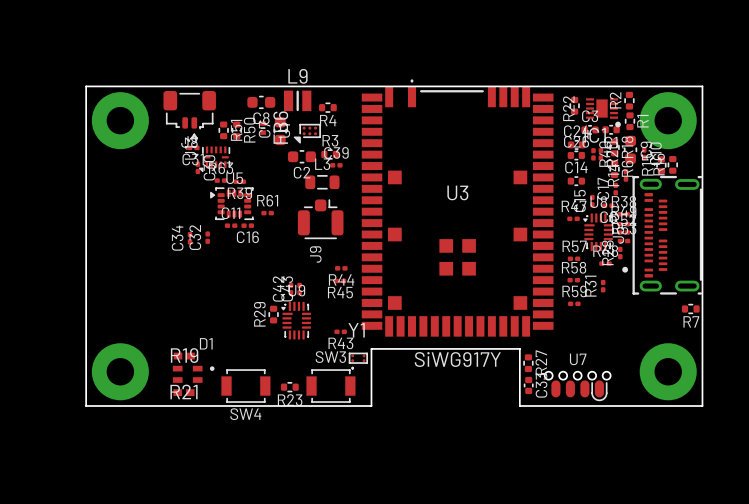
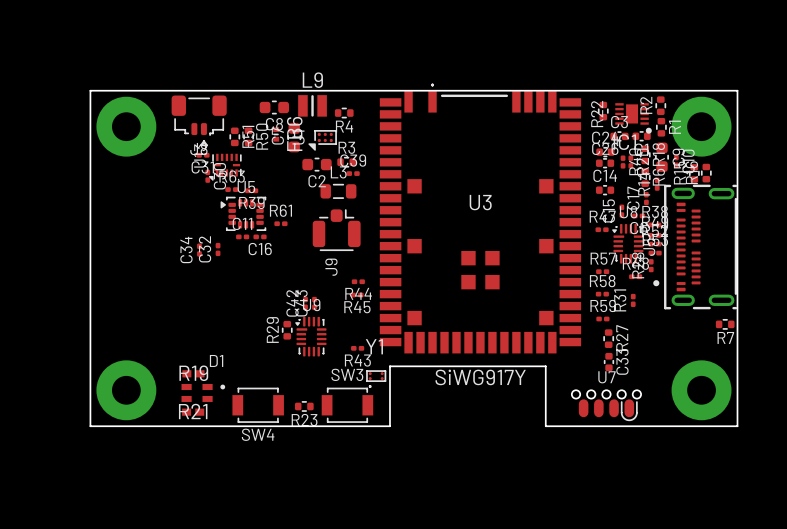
R27 position: (528, 363) -> (608, 338)
C33 position: (528, 385) -> (608, 362)

